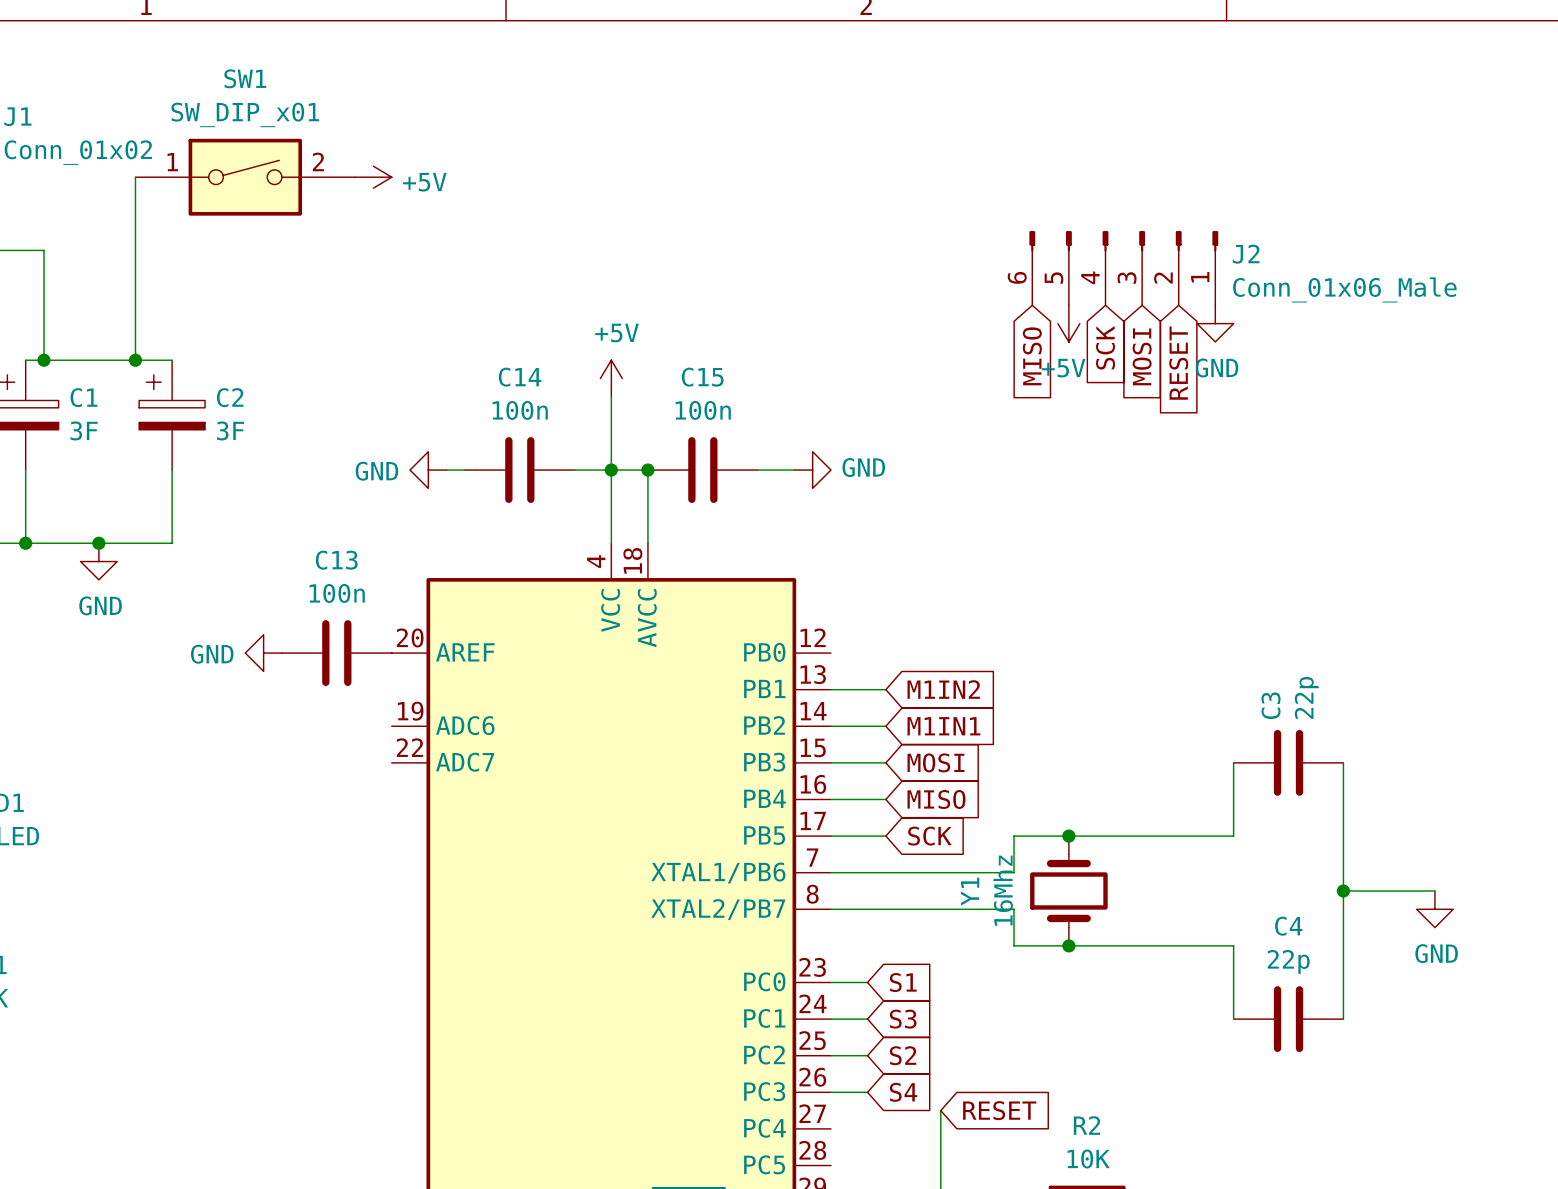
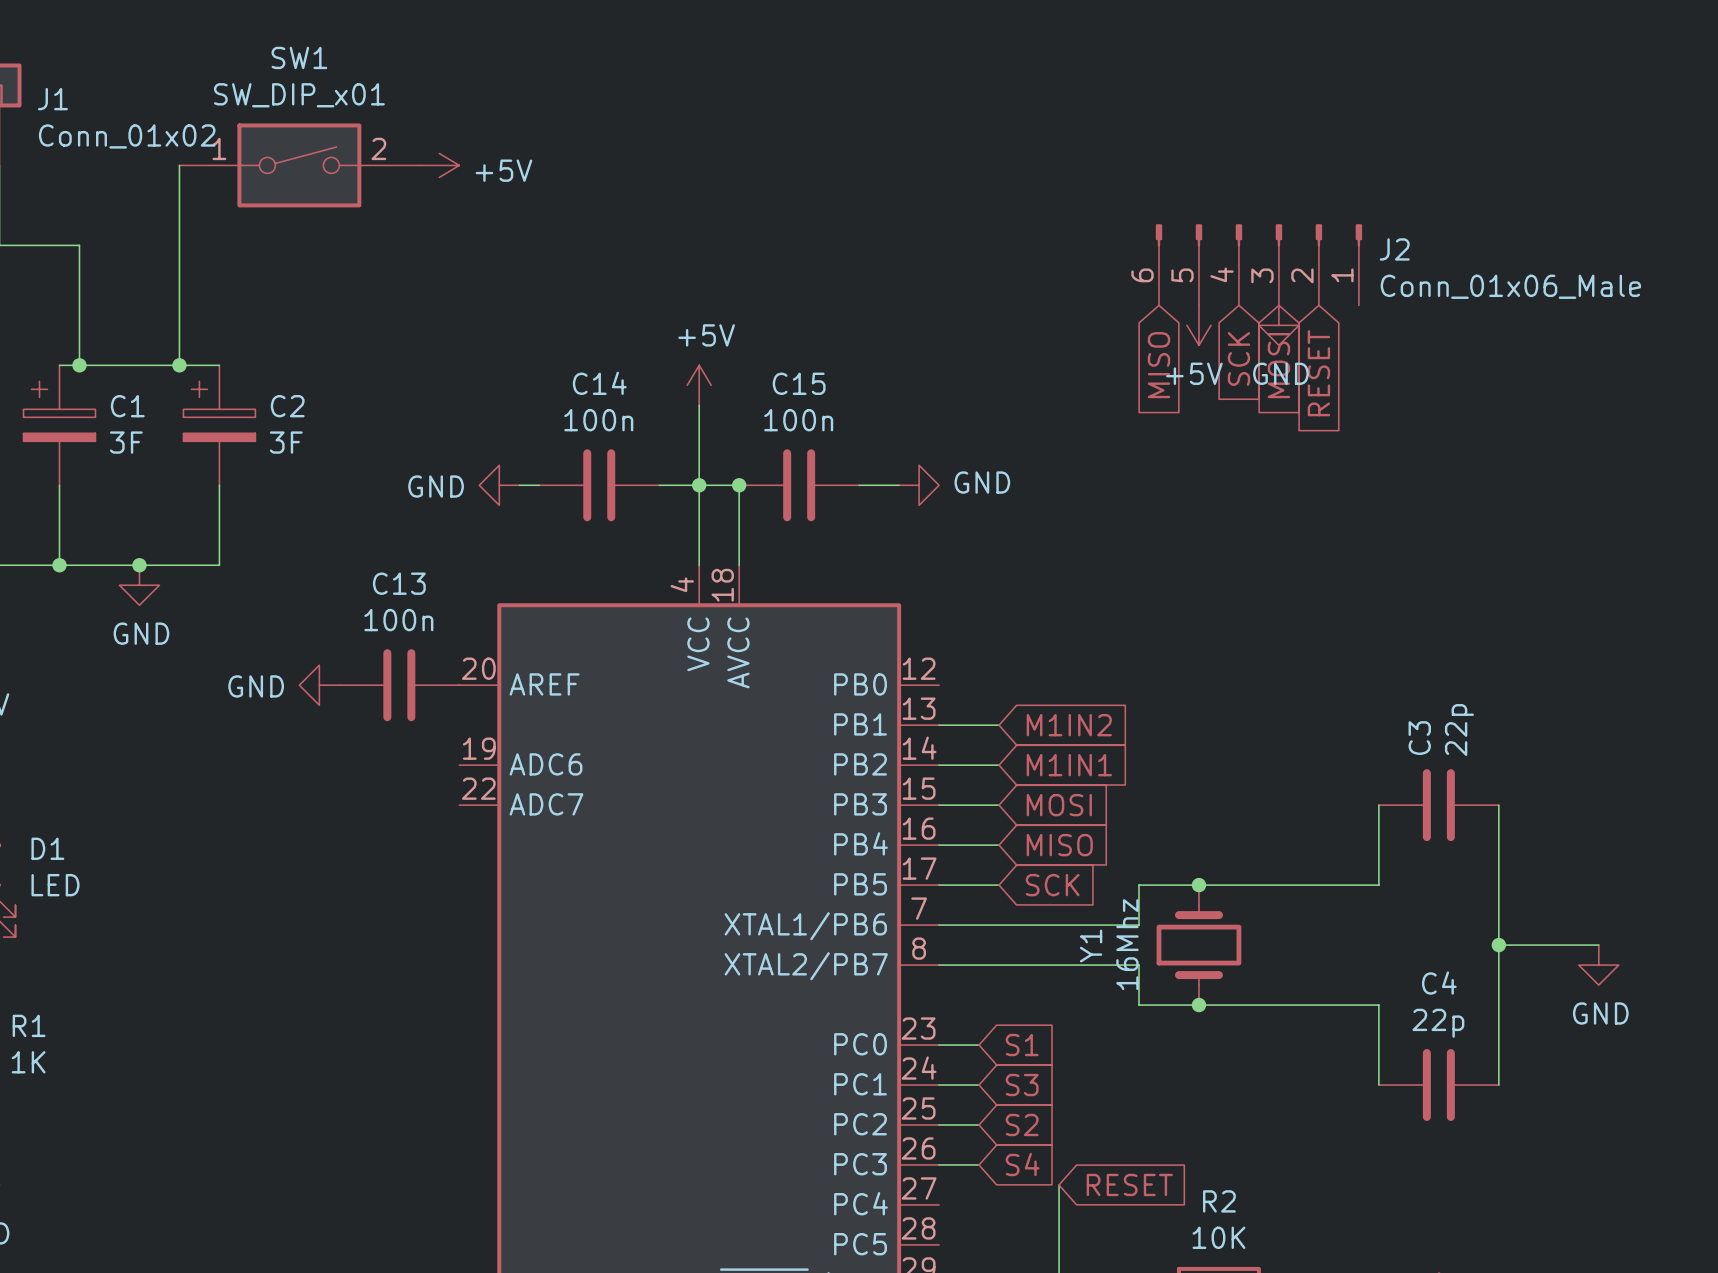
power symbol position: GND (1215, 323) -> GND (1278, 325)

